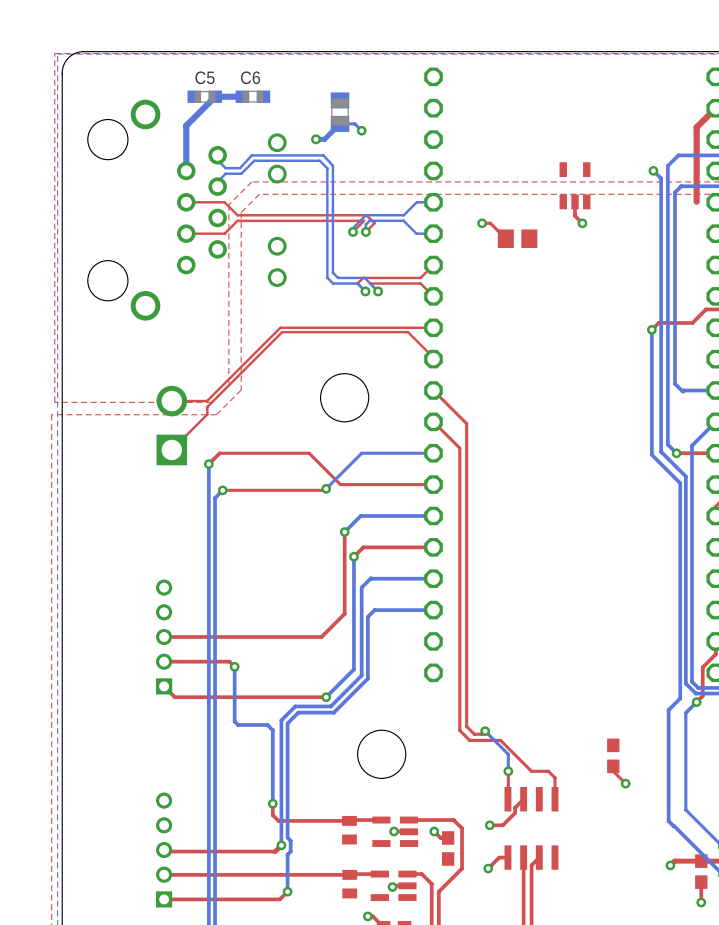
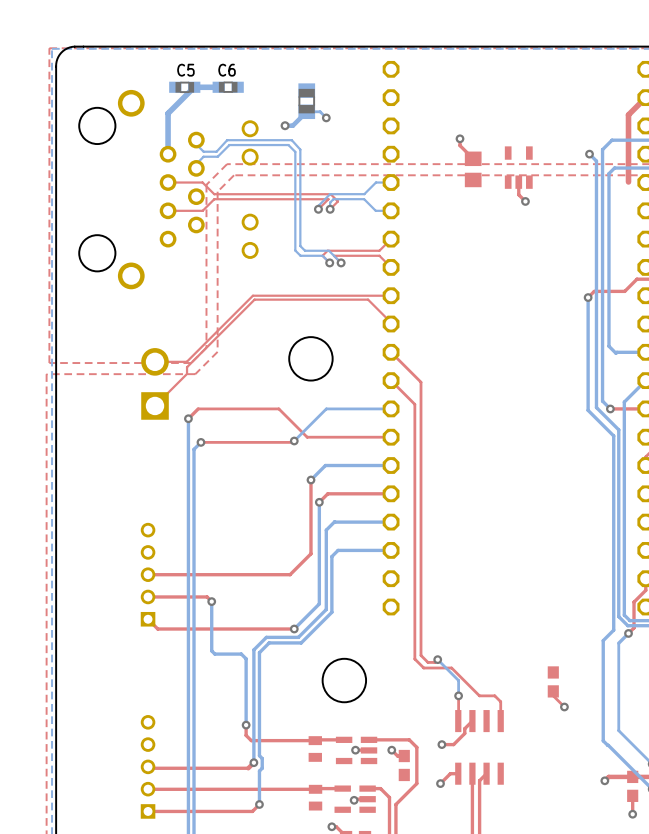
top track: none -> (460, 138) (460, 145) (473, 158)
via: none -> (460, 138)
top track: (482, 223) (490, 223) (505, 238) -> none
via: (482, 223) -> none
part rotation: 0° (517, 238) -> 90° clockwise (473, 169)
part position: (517, 238) -> (473, 169)

